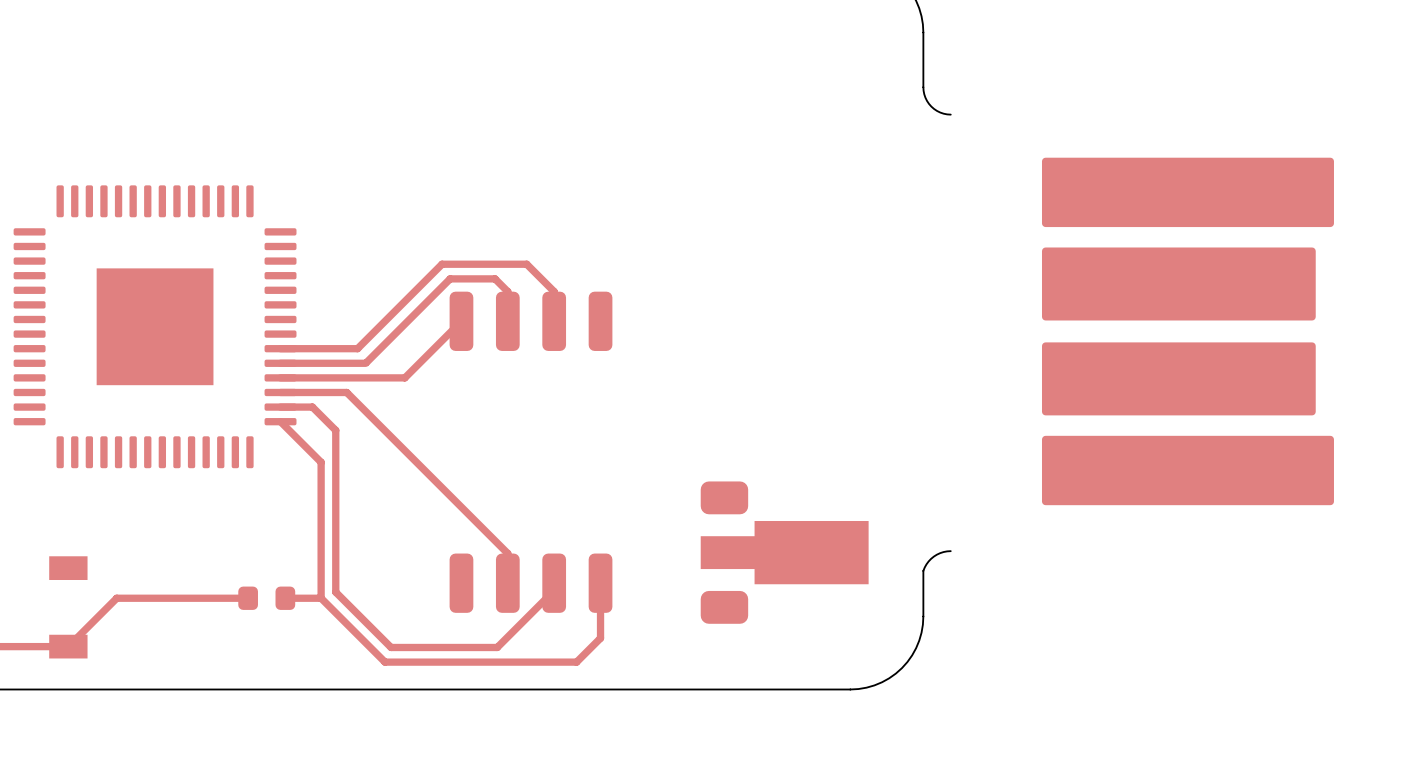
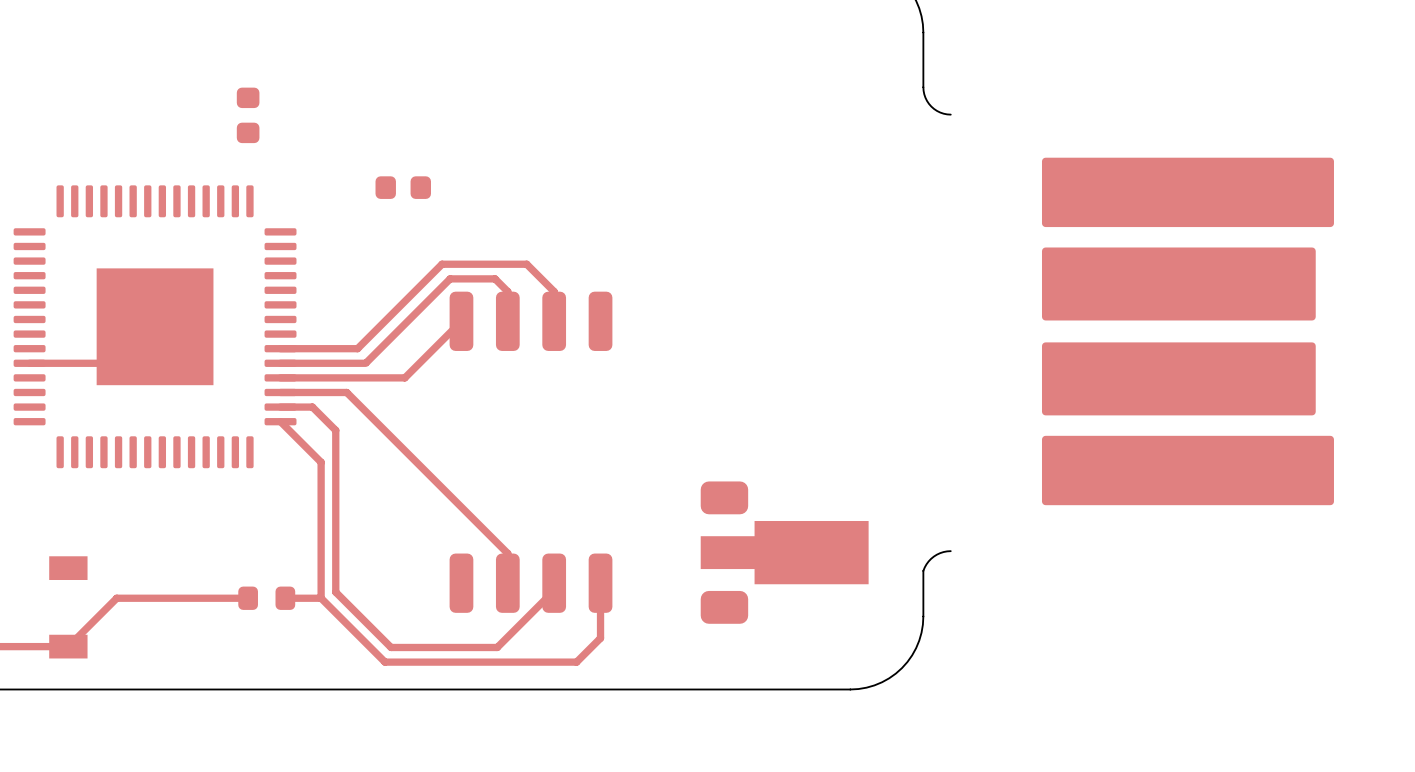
part: none -> (248, 115)
part: none -> (403, 187)
top track: none -> (118, 363) (29, 363)

